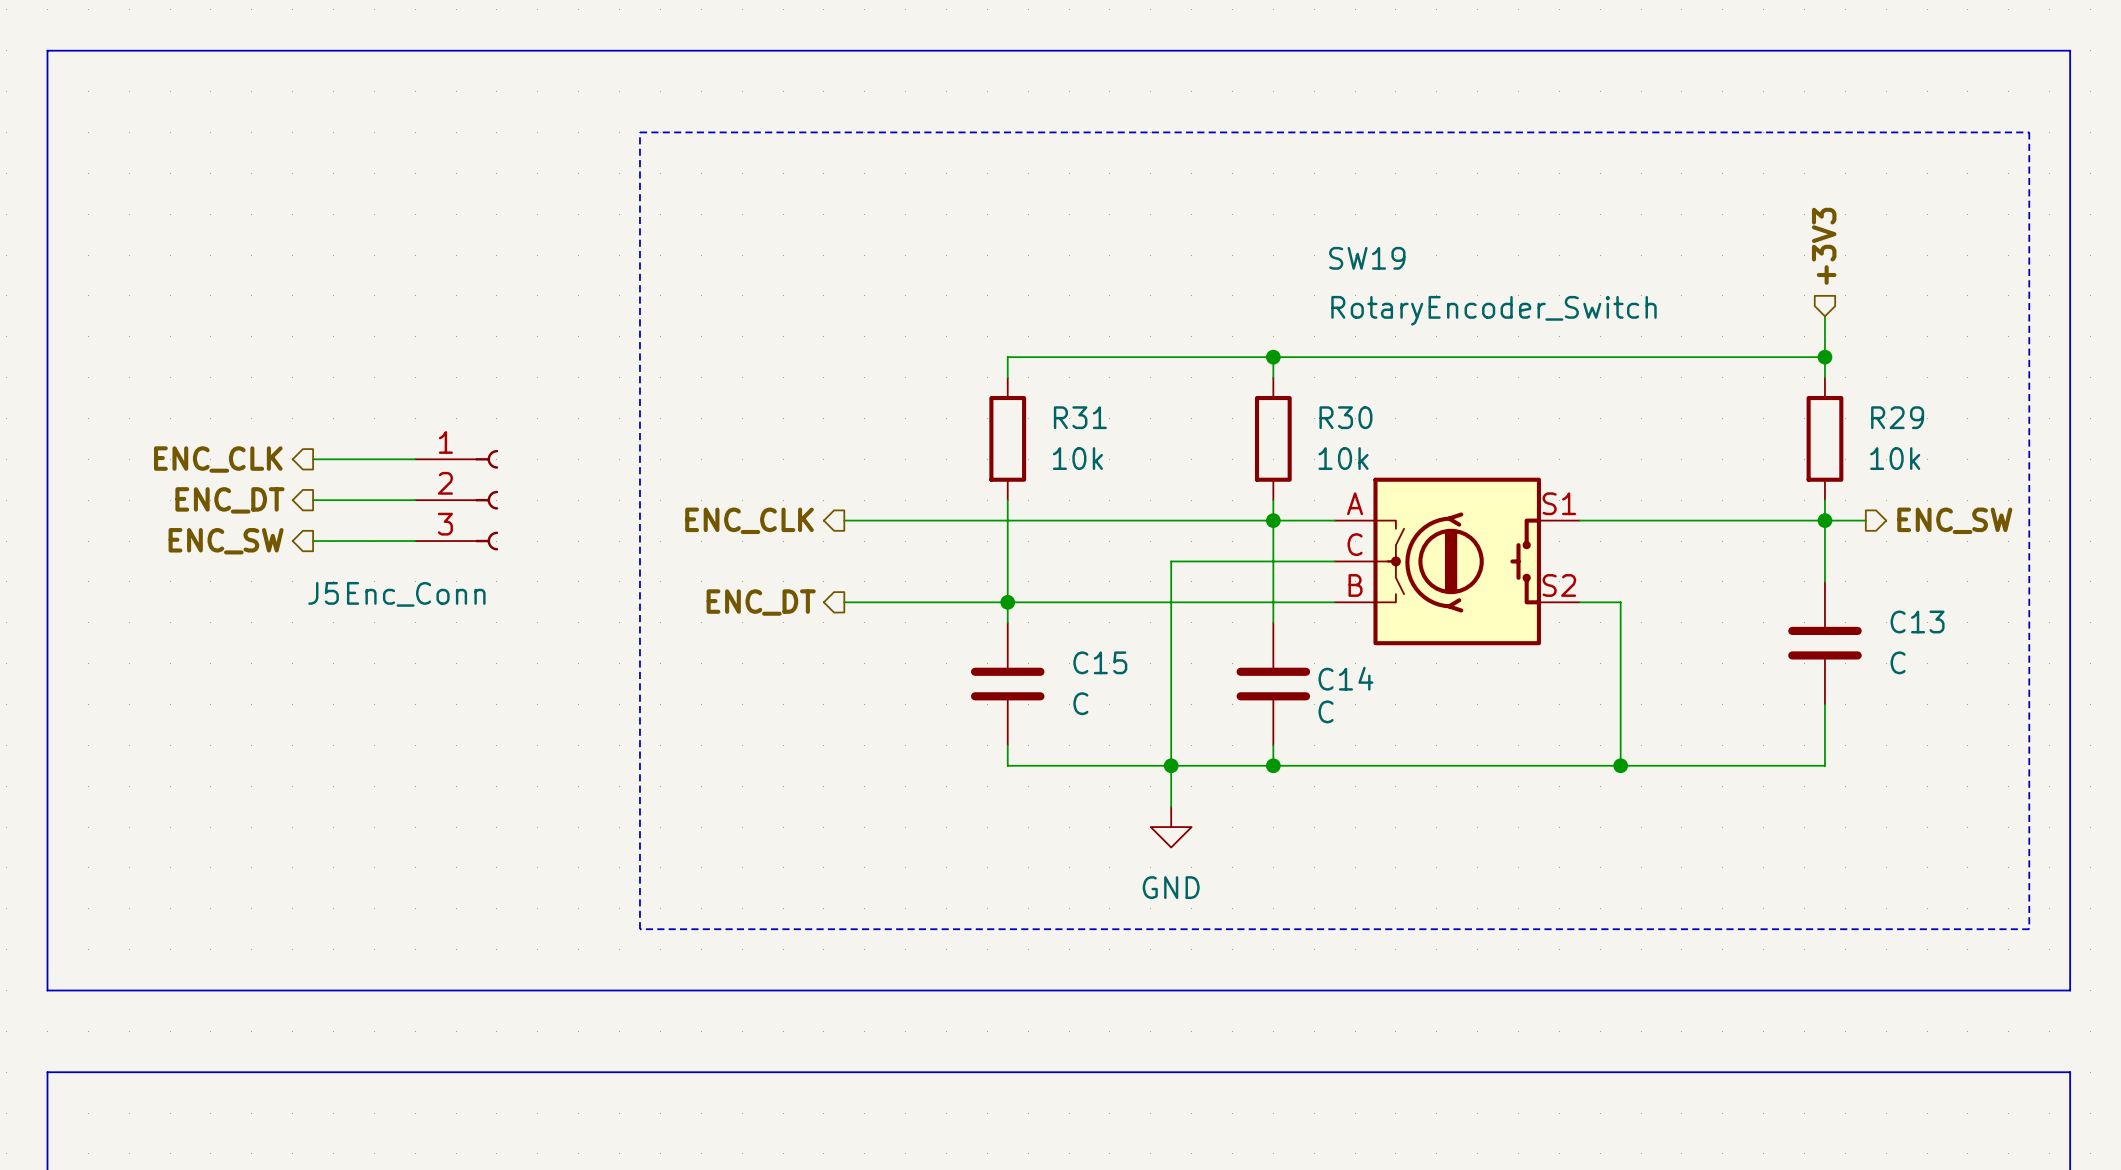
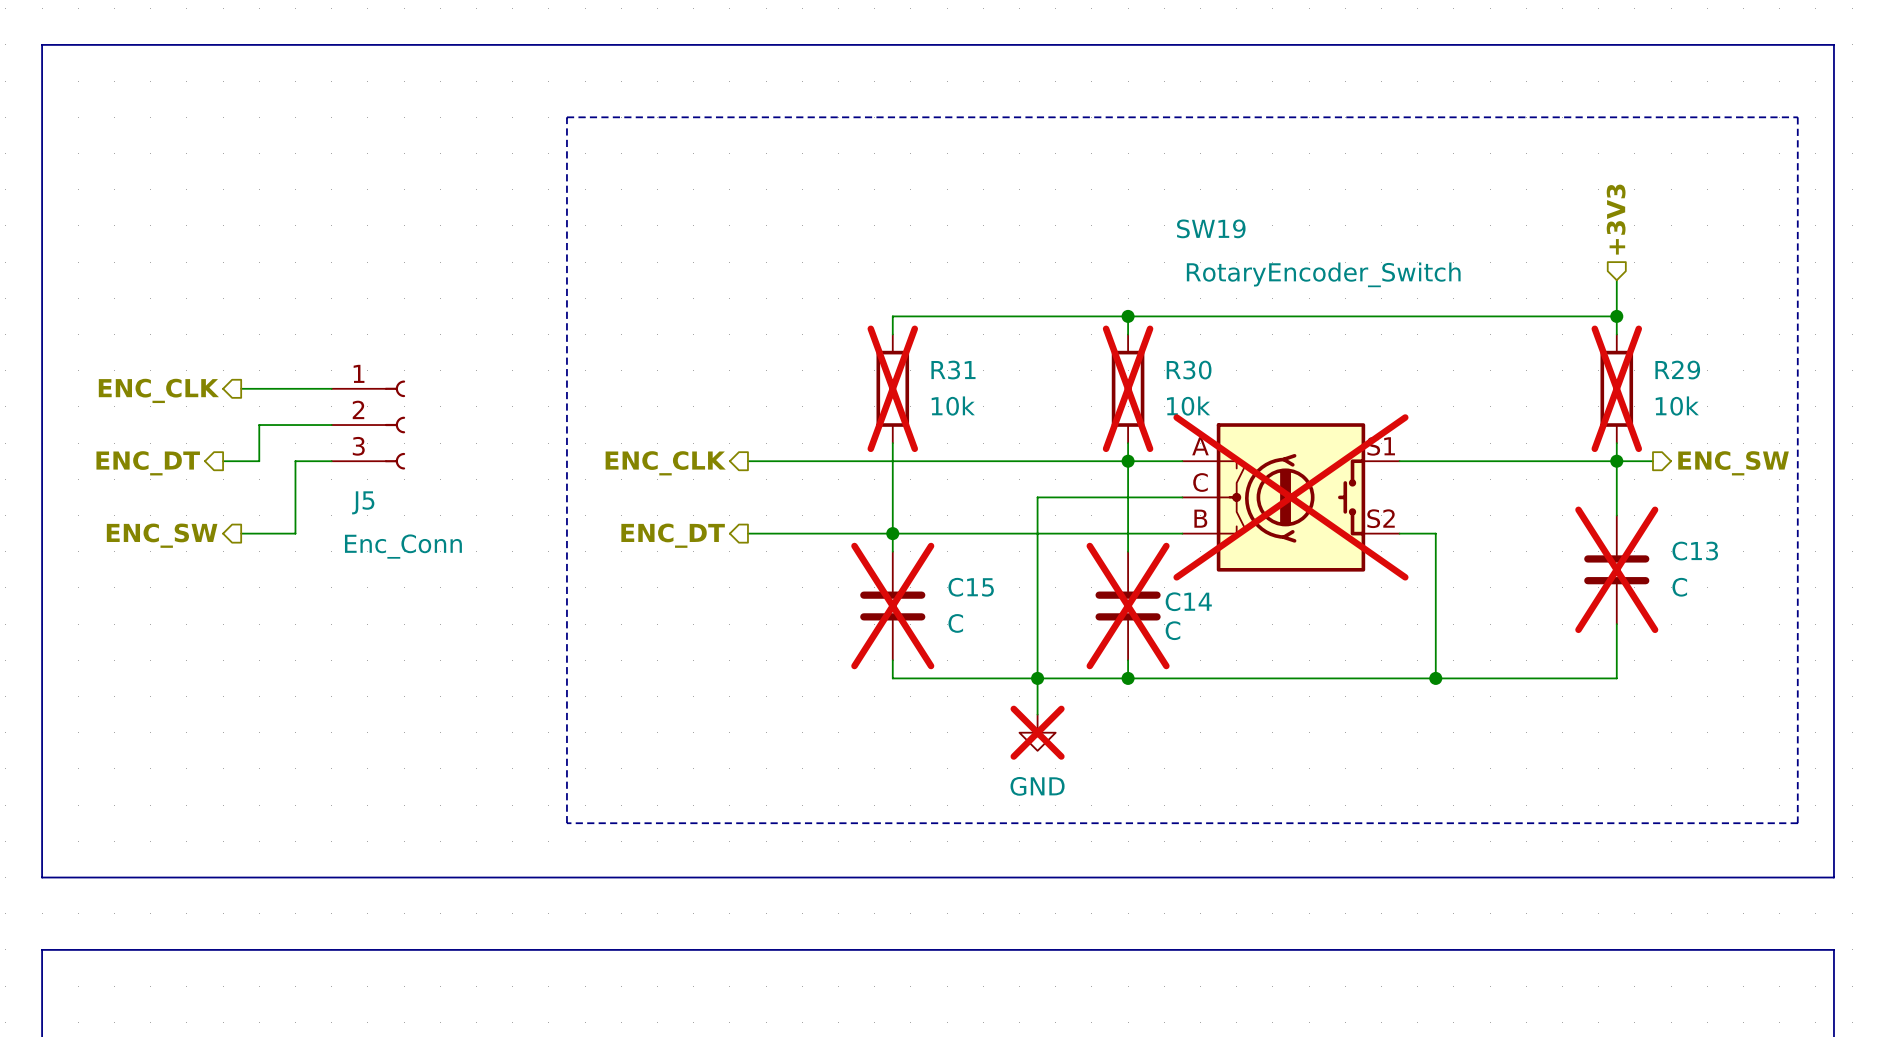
R31 do-not-place cross: none -> (892, 388)
R30 do-not-place cross: none -> (1128, 388)
R29 do-not-place cross: none -> (1616, 388)
hierarchical label position: ENC_CLK (218, 459) -> ENC_CLK (158, 390)
wire: (313, 459) (415, 459) -> (241, 388) (331, 388)
wire: none -> (331, 425) (259, 425) (259, 461) (223, 461)
hierarchical label position: ENC_DT (229, 500) -> ENC_DT (148, 463)
wire: (313, 500) (415, 500) -> none
J5 position: (456, 500) -> (368, 425)
wire: none -> (331, 461) (295, 461) (295, 533) (241, 533)
hierarchical label position: ENC_SW (226, 541) -> ENC_SW (162, 535)
wire: (313, 541) (415, 541) -> none
SW19 do-not-place cross: none -> (1290, 497)
J5 name position: J5 (323, 593) -> J5 (363, 502)
J5 value position: Enc_Conn (416, 594) -> Enc_Conn (403, 546)
C13 do-not-place cross: none -> (1616, 569)
C15 do-not-place cross: none -> (892, 606)
C14 do-not-place cross: none -> (1128, 606)
power symbol do-not-place cross: none -> (1037, 732)

